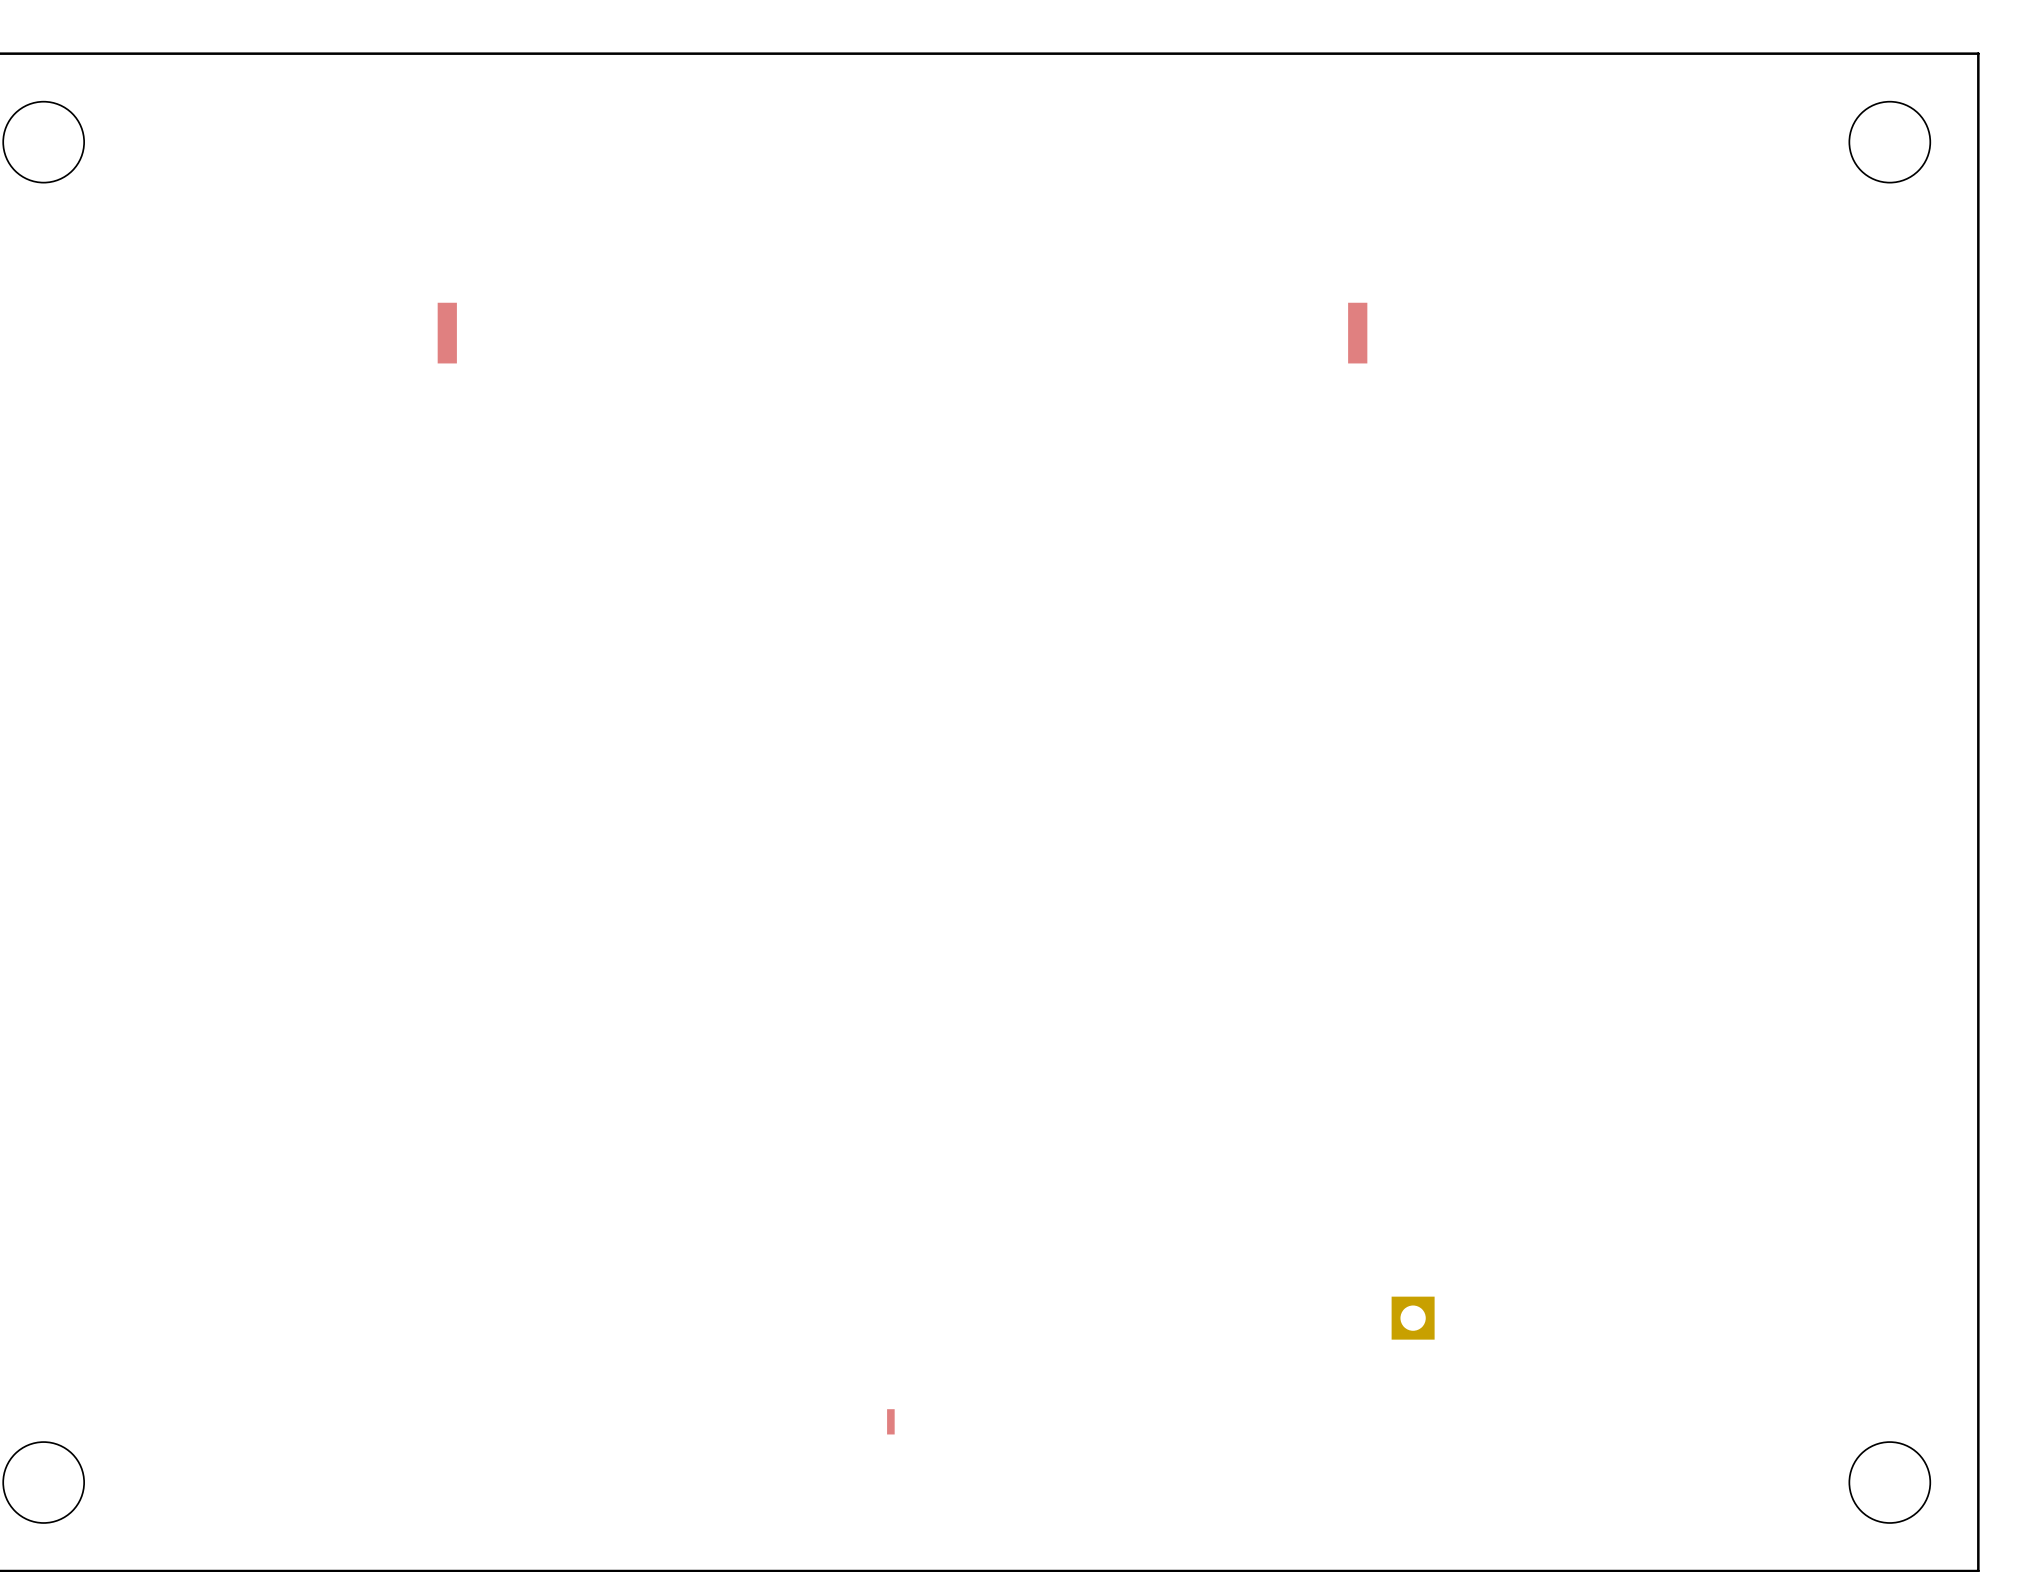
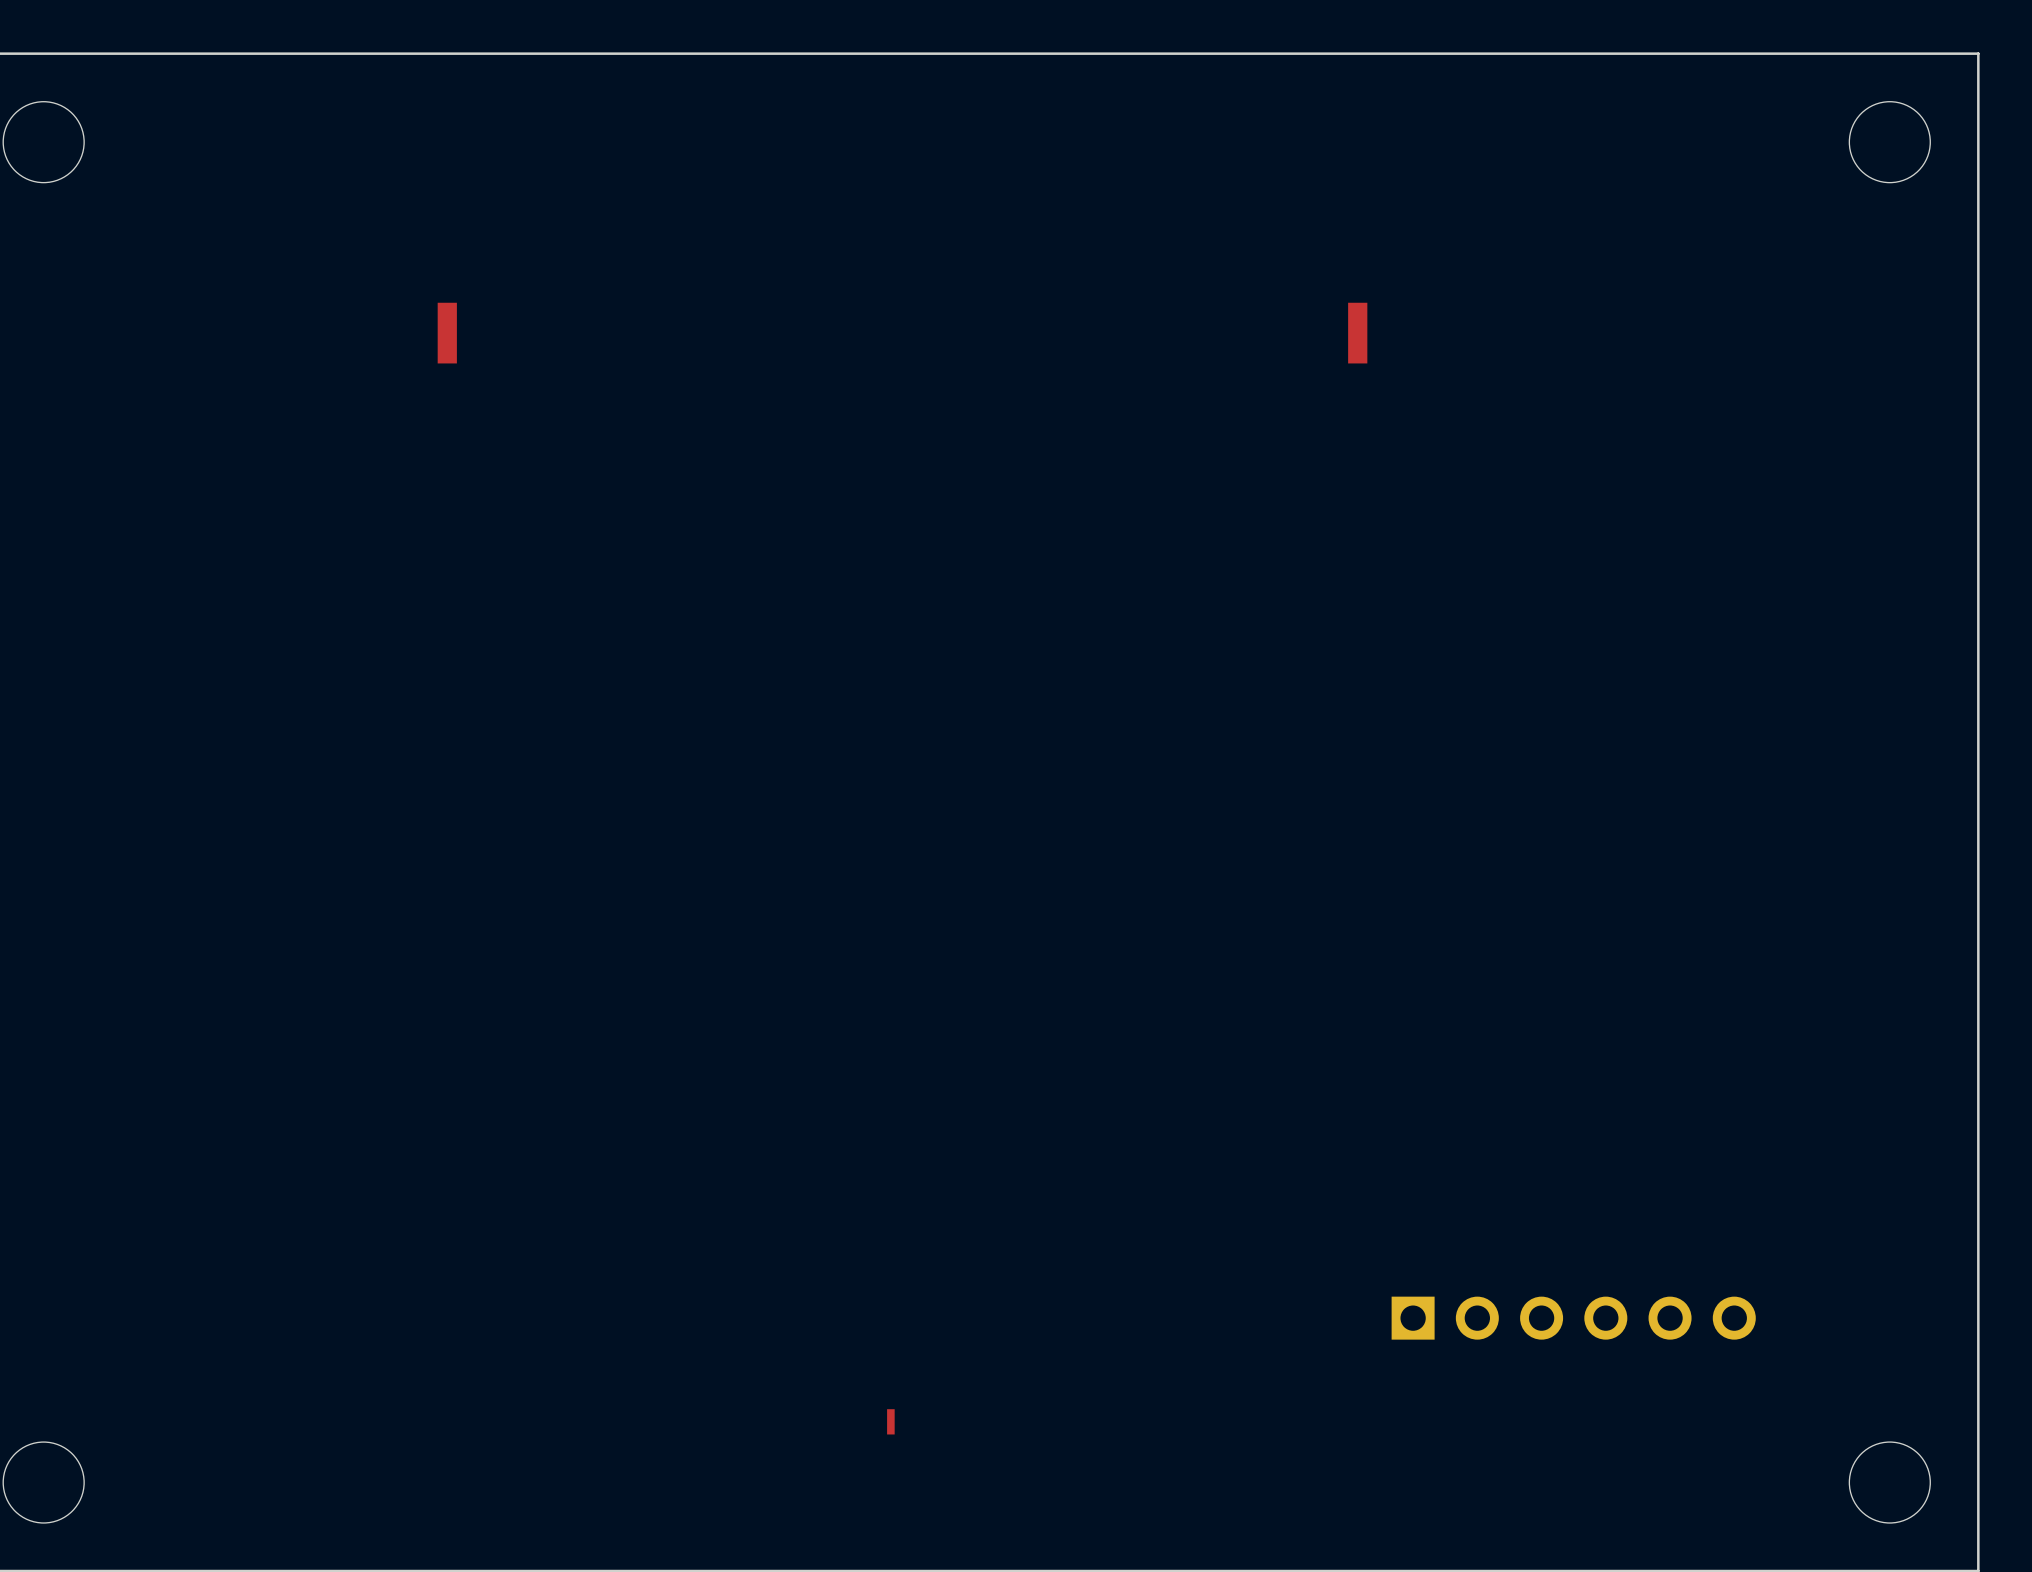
part: none -> (1573, 1318)

